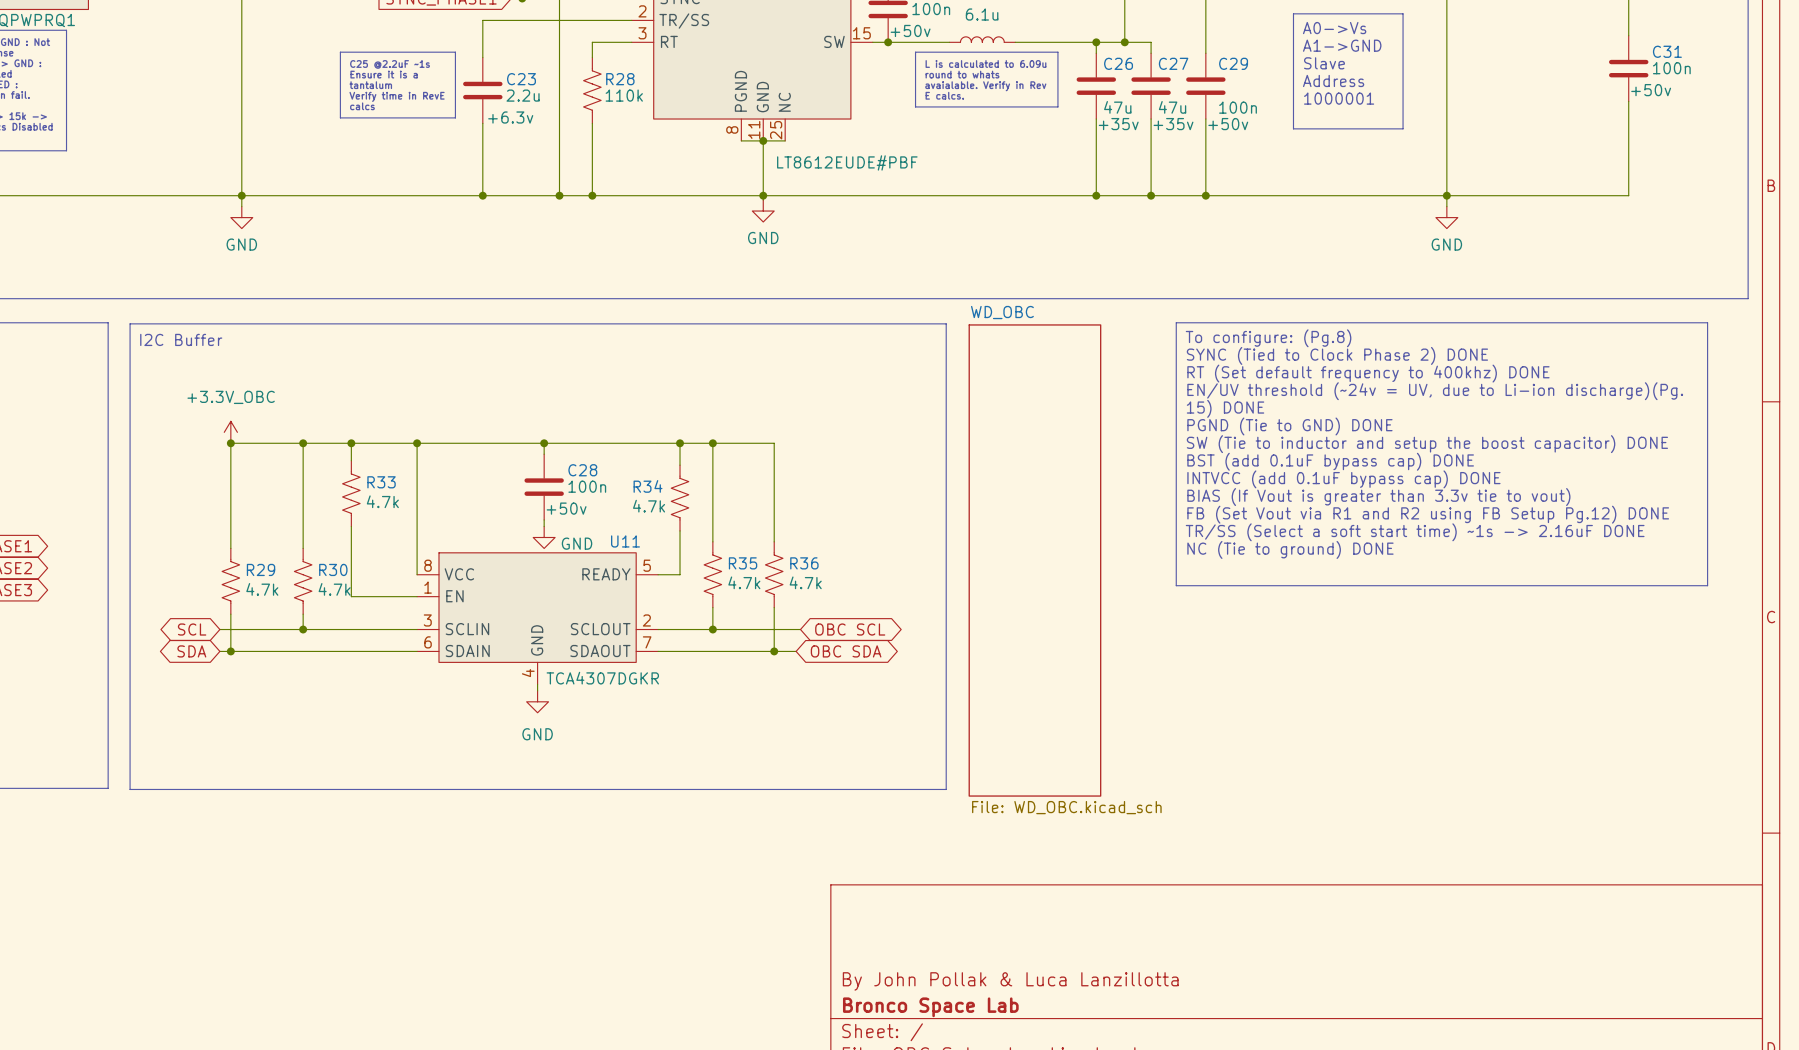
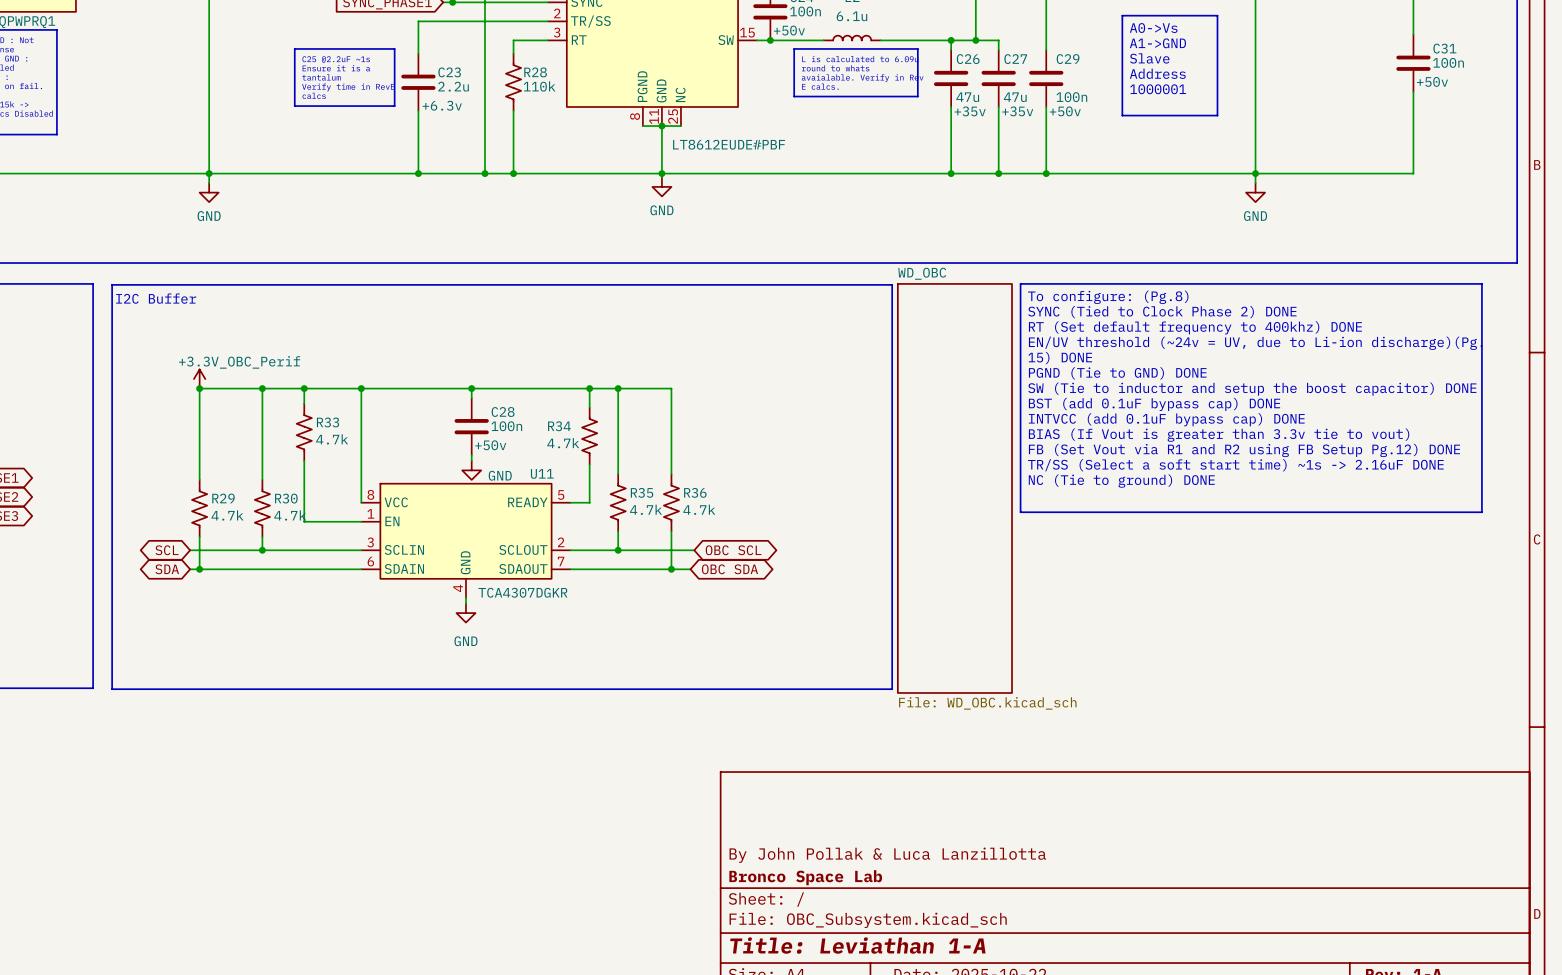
line: (946, 323) (946, 789) -> (820, 284) (892, 284) (892, 689) (820, 689)
power symbol: +3.3V_OBC (230, 432) -> +3.3V_OBC_Perif (199, 379)
sheet WD_OBC position: (1034, 560) -> (954, 488)

